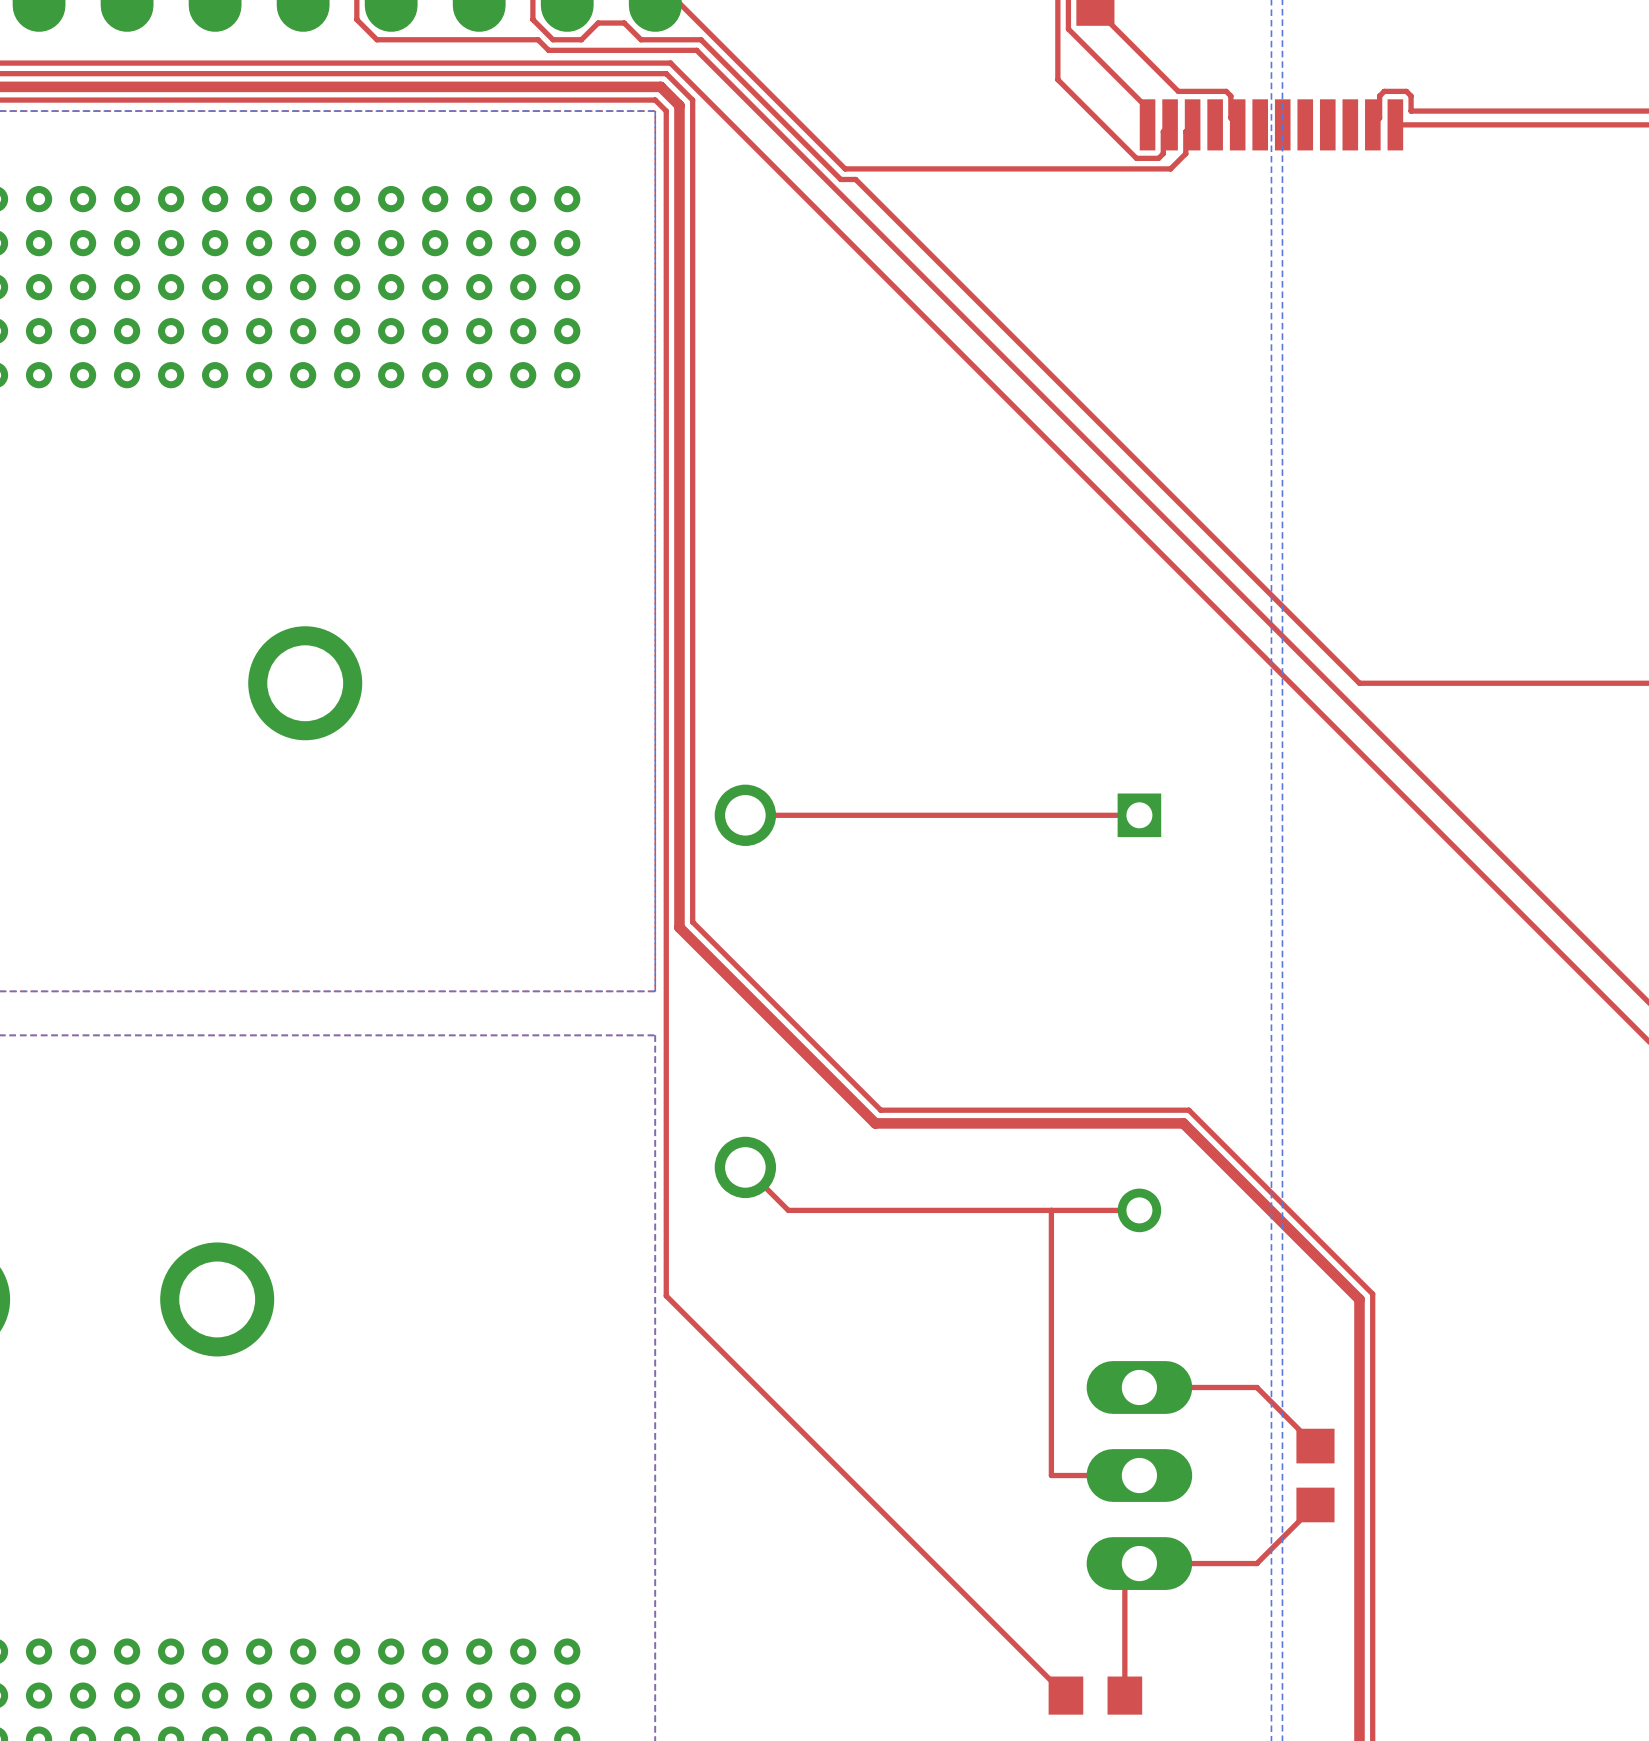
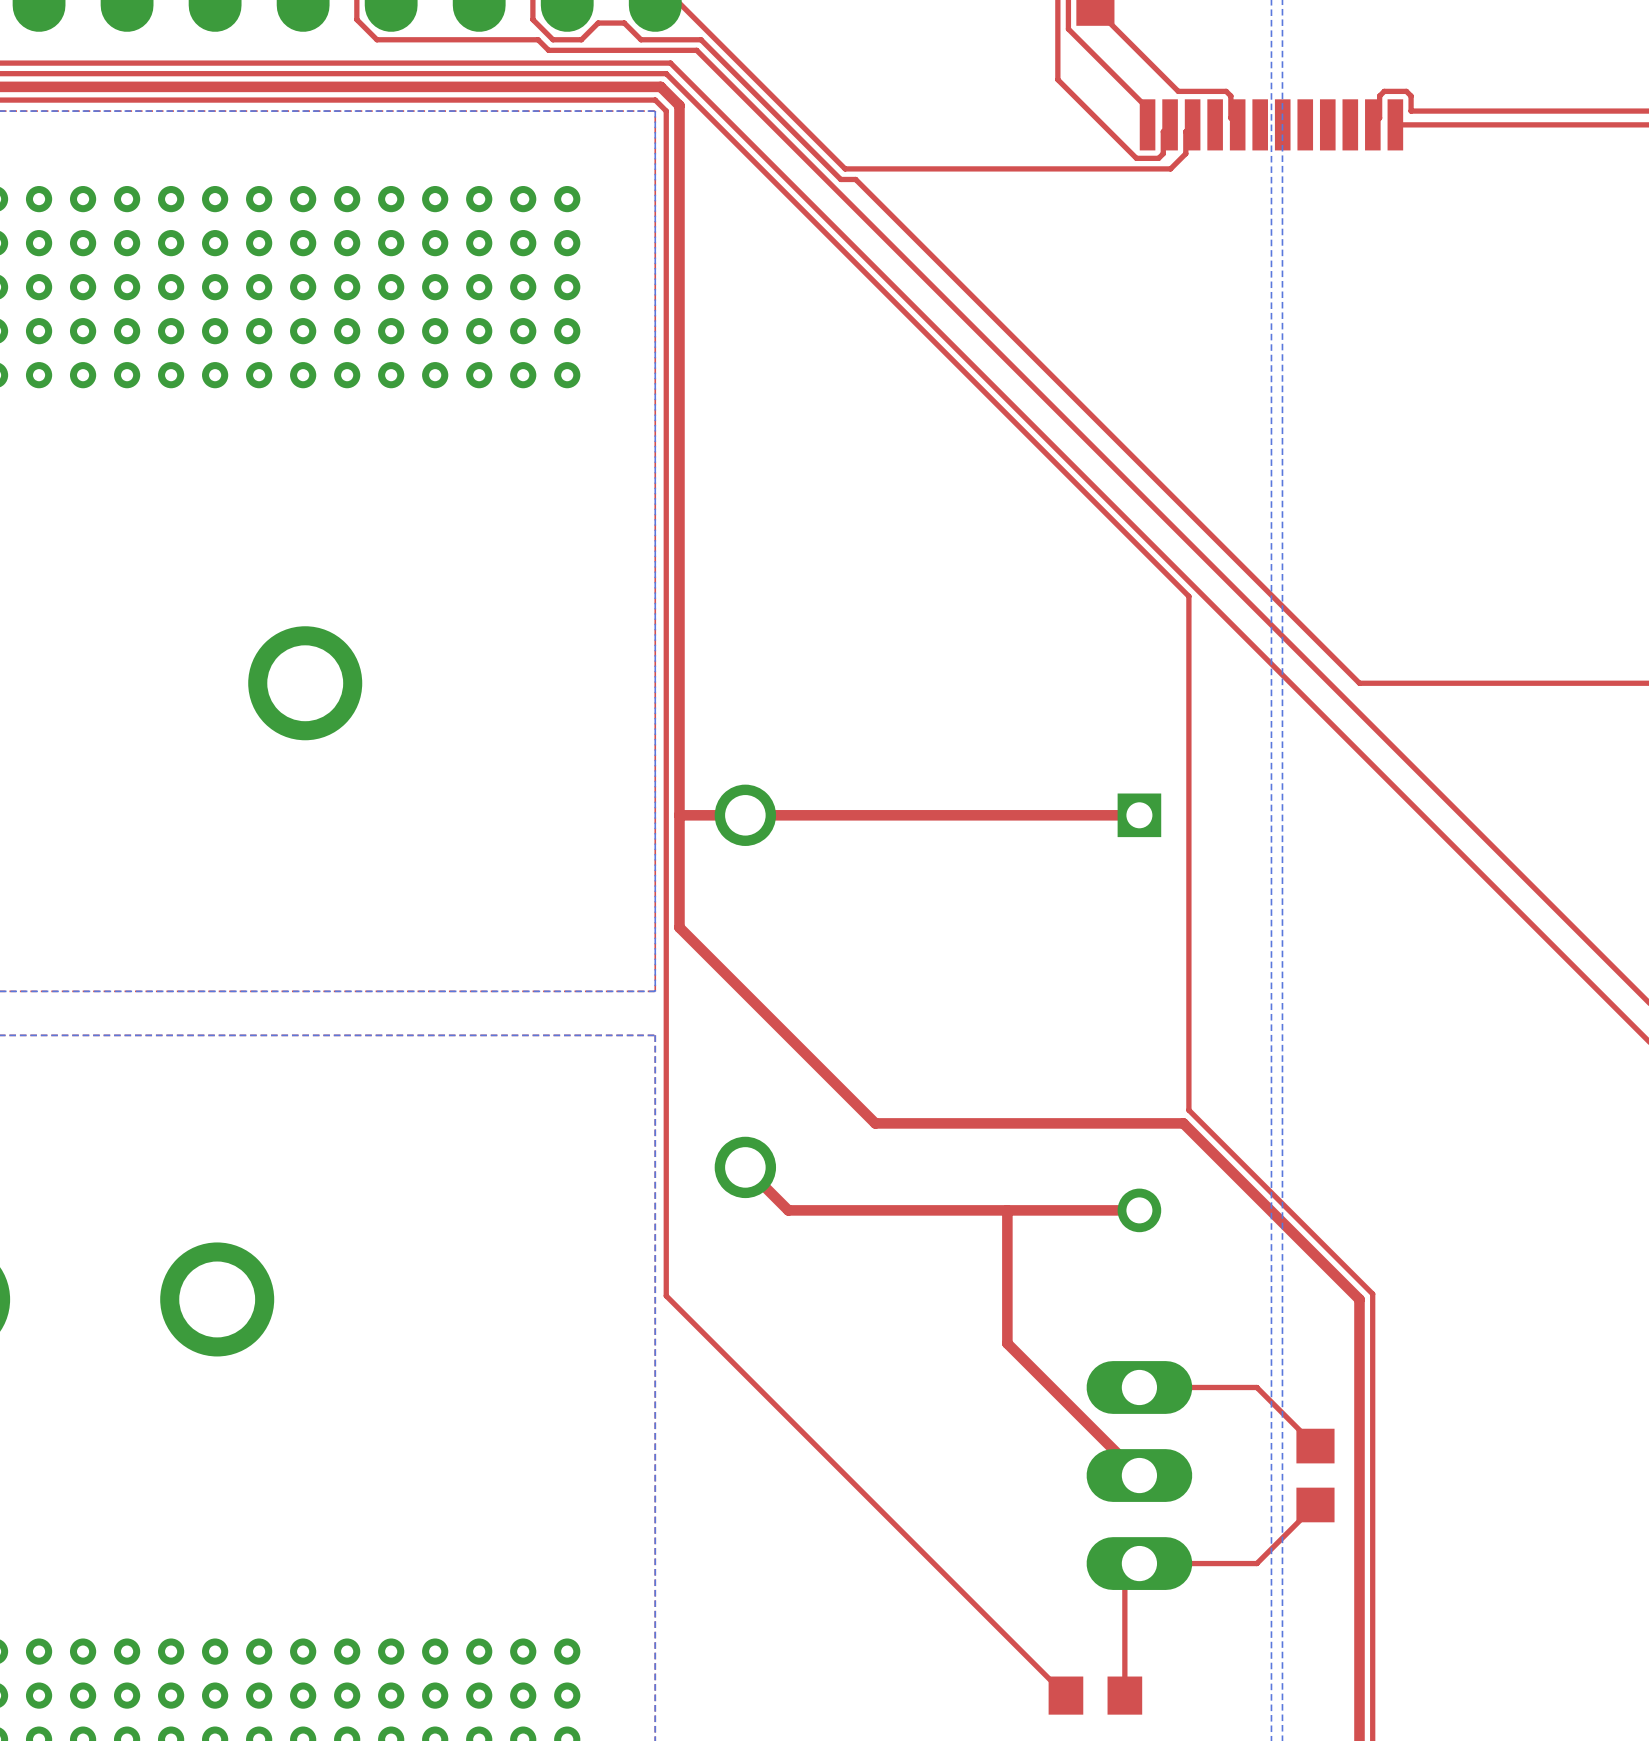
top track: (692, 100) (692, 922) (880, 1110) (1188, 1110) -> (692, 100) (1188, 596) (1188, 1110)
top track: none -> (745, 815) (679, 815)
top track width: thin (1139, 815) (745, 815) -> thick (1139, 815) (745, 815)
top track width: thin (745, 1167) (788, 1210) (1139, 1210) -> thick (745, 1167) (788, 1210) (1139, 1210)
top track: (1051, 1210) (1051, 1475) (1139, 1475) -> (1007, 1210) (1007, 1343) (1139, 1475)

